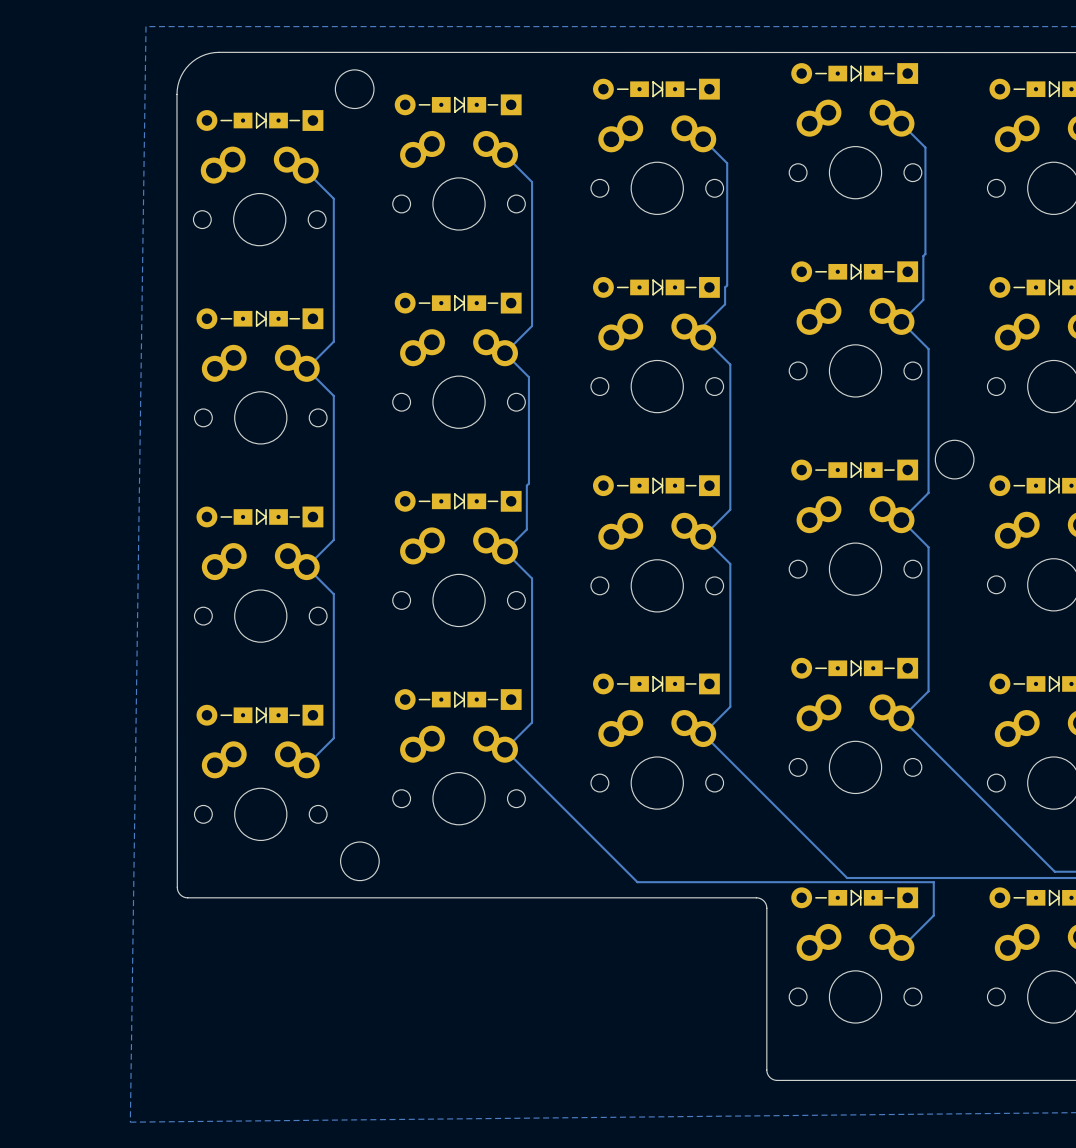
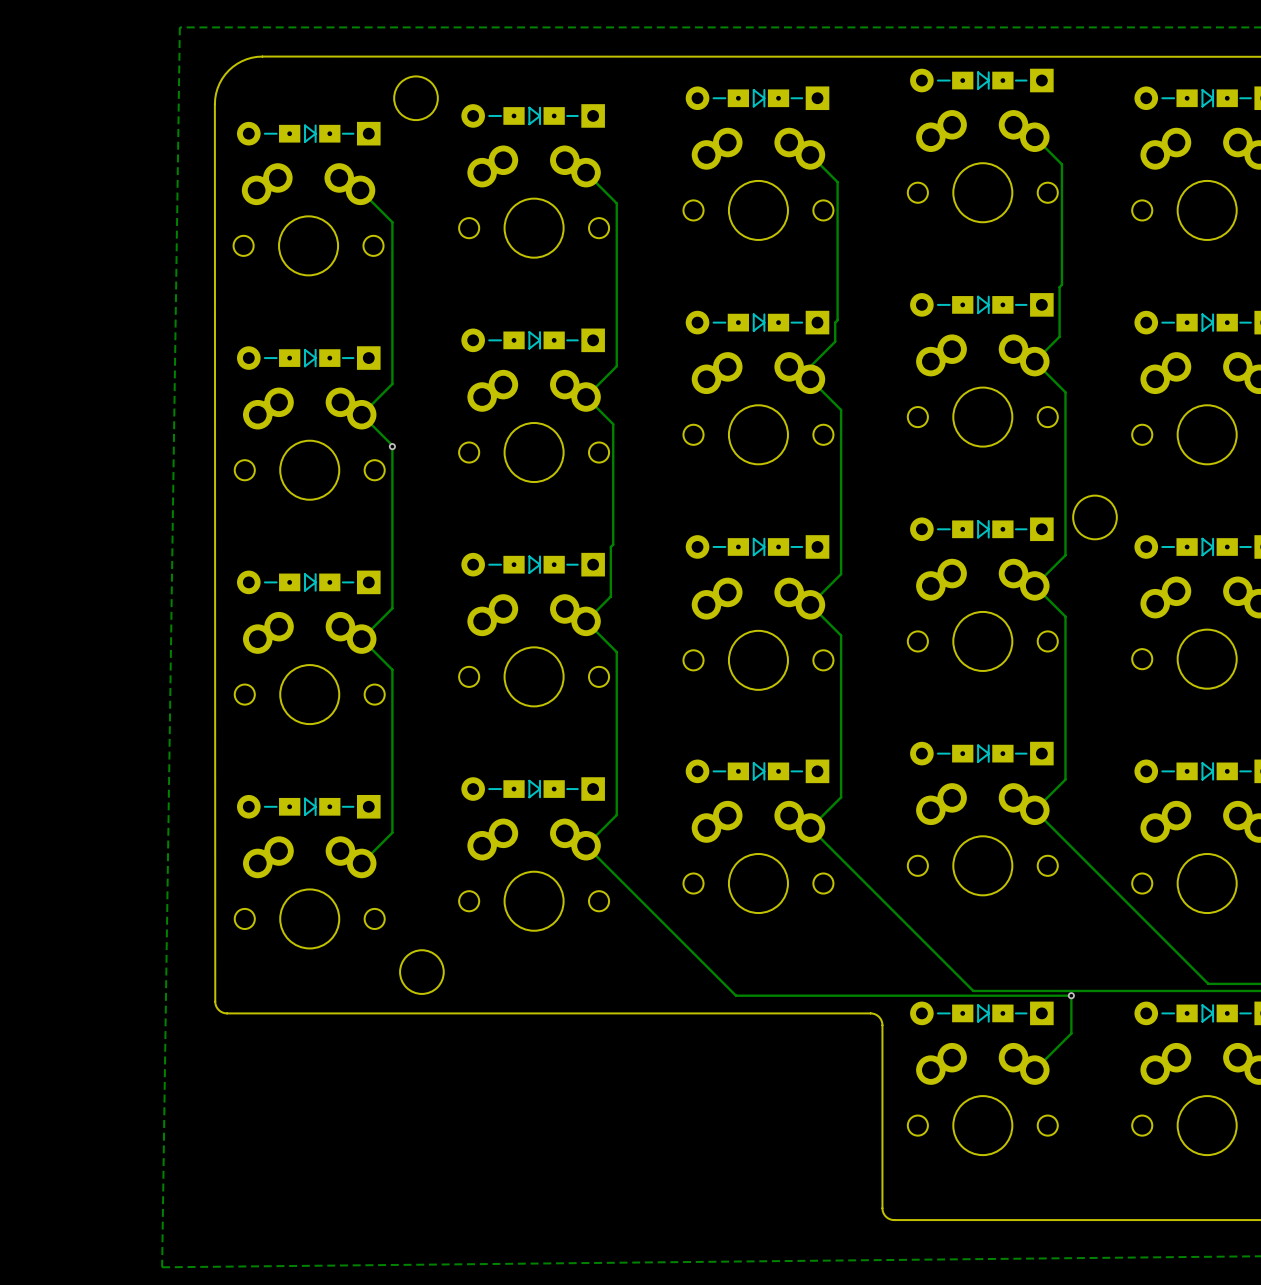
via: none -> (392, 446)
via: none -> (1071, 995)

